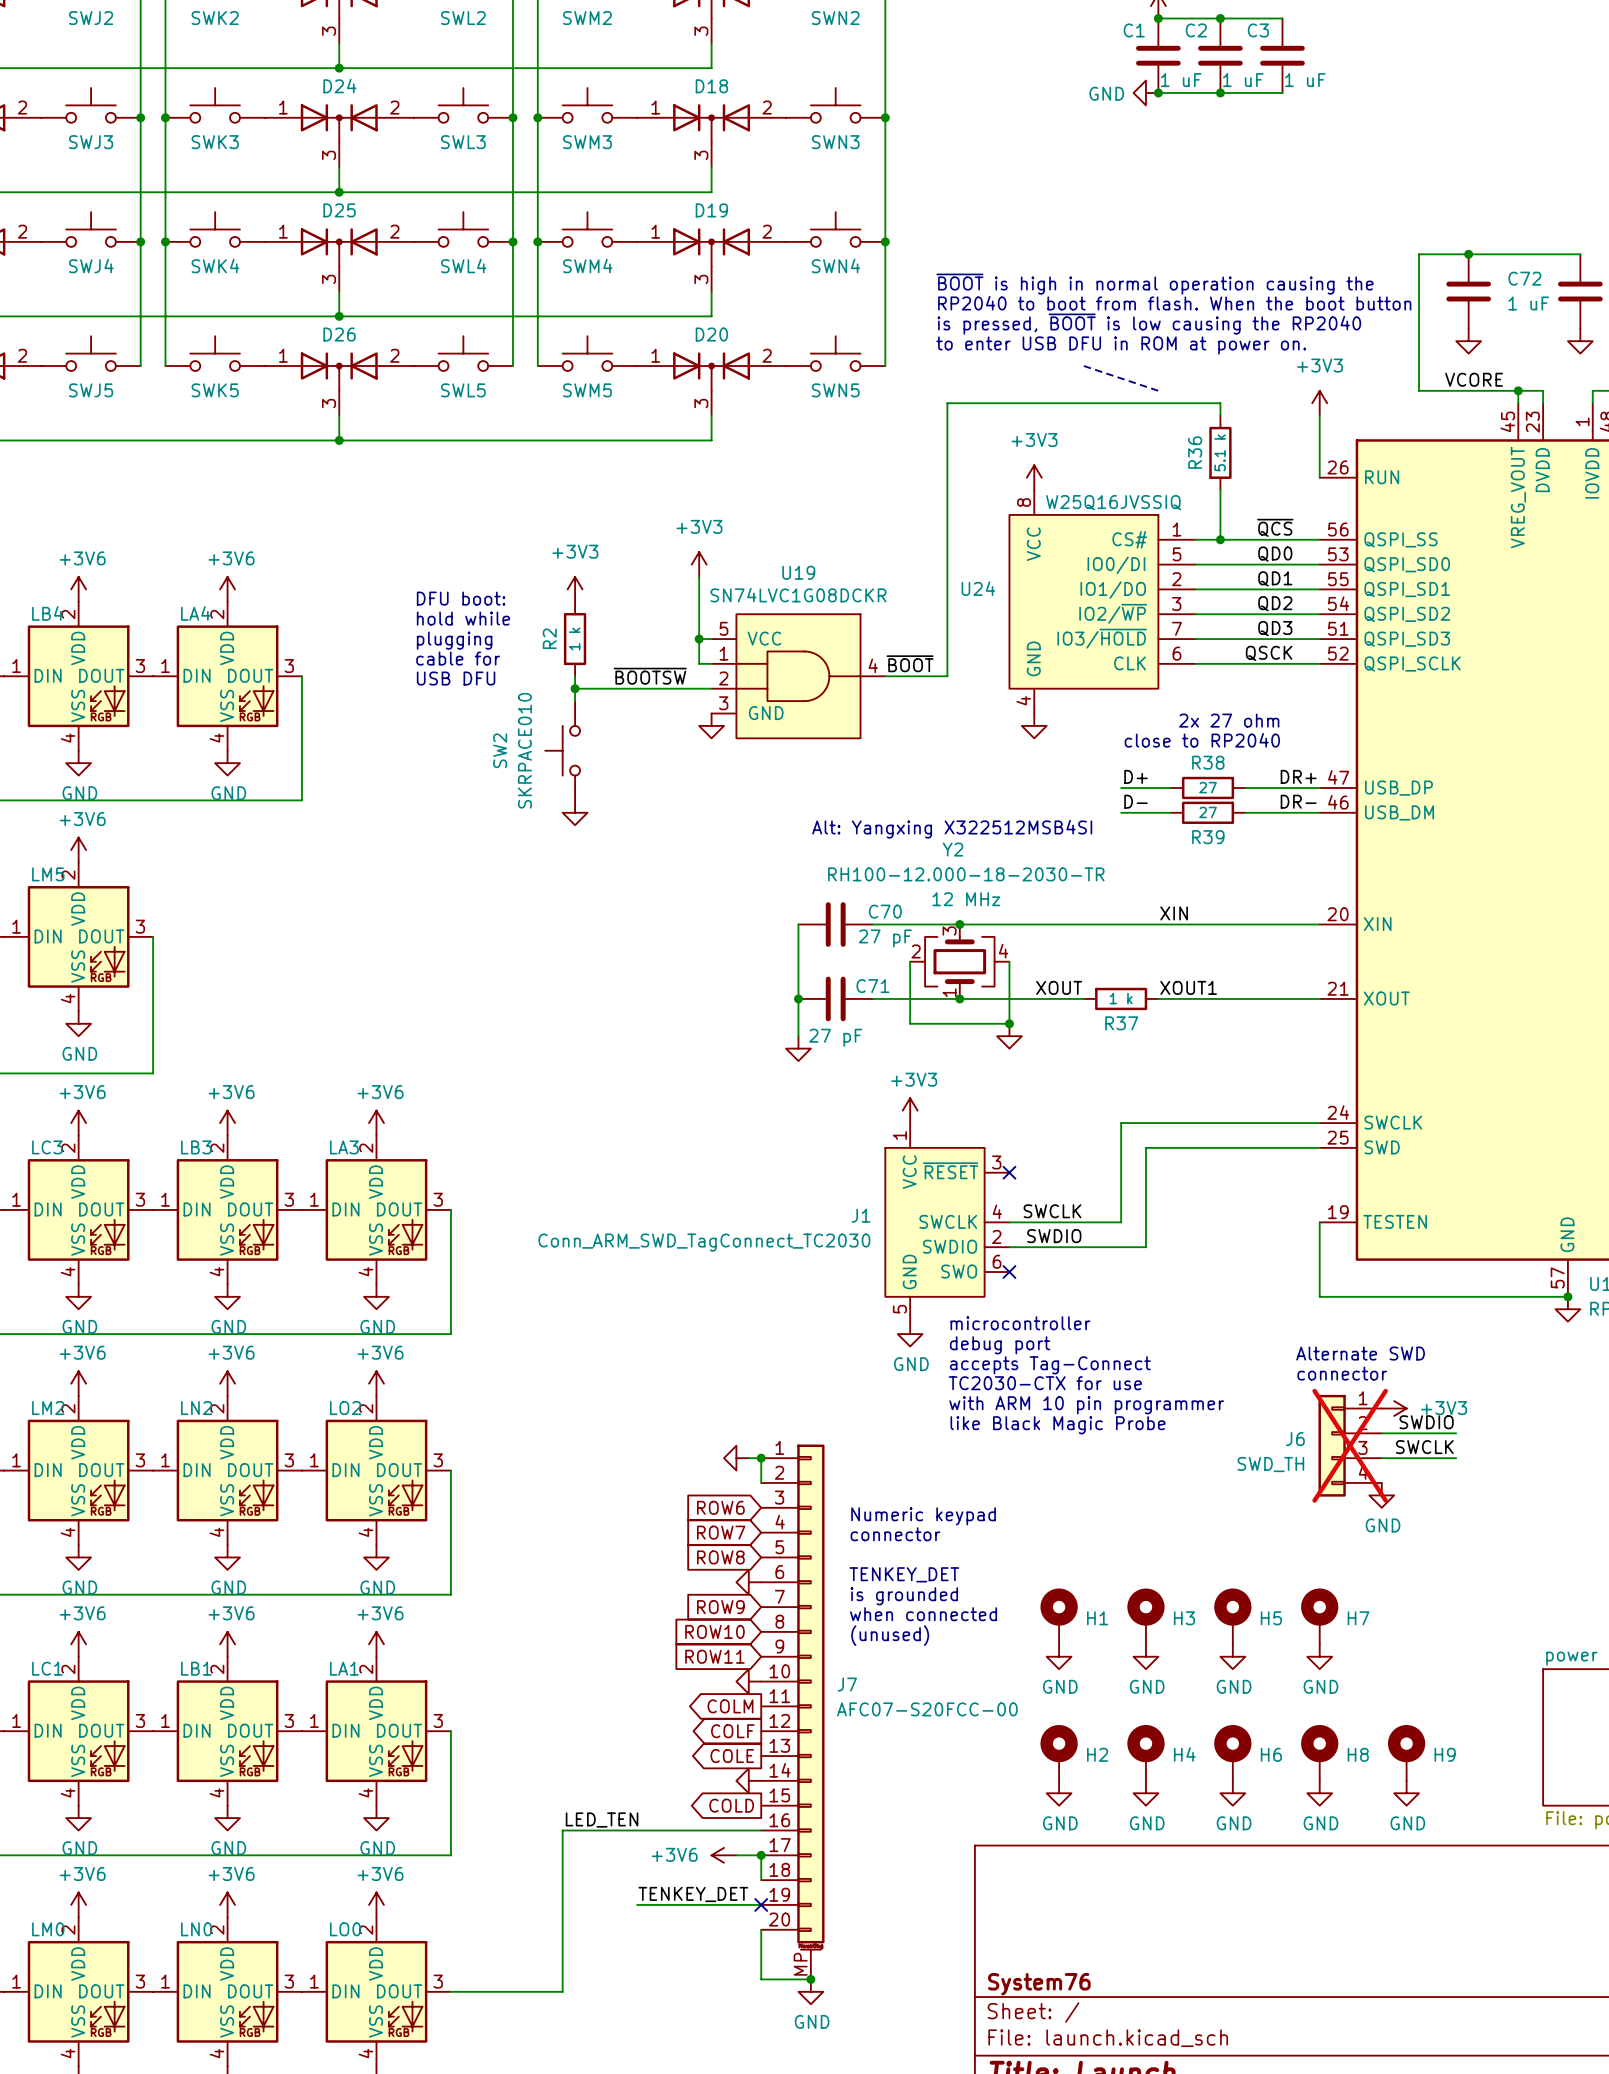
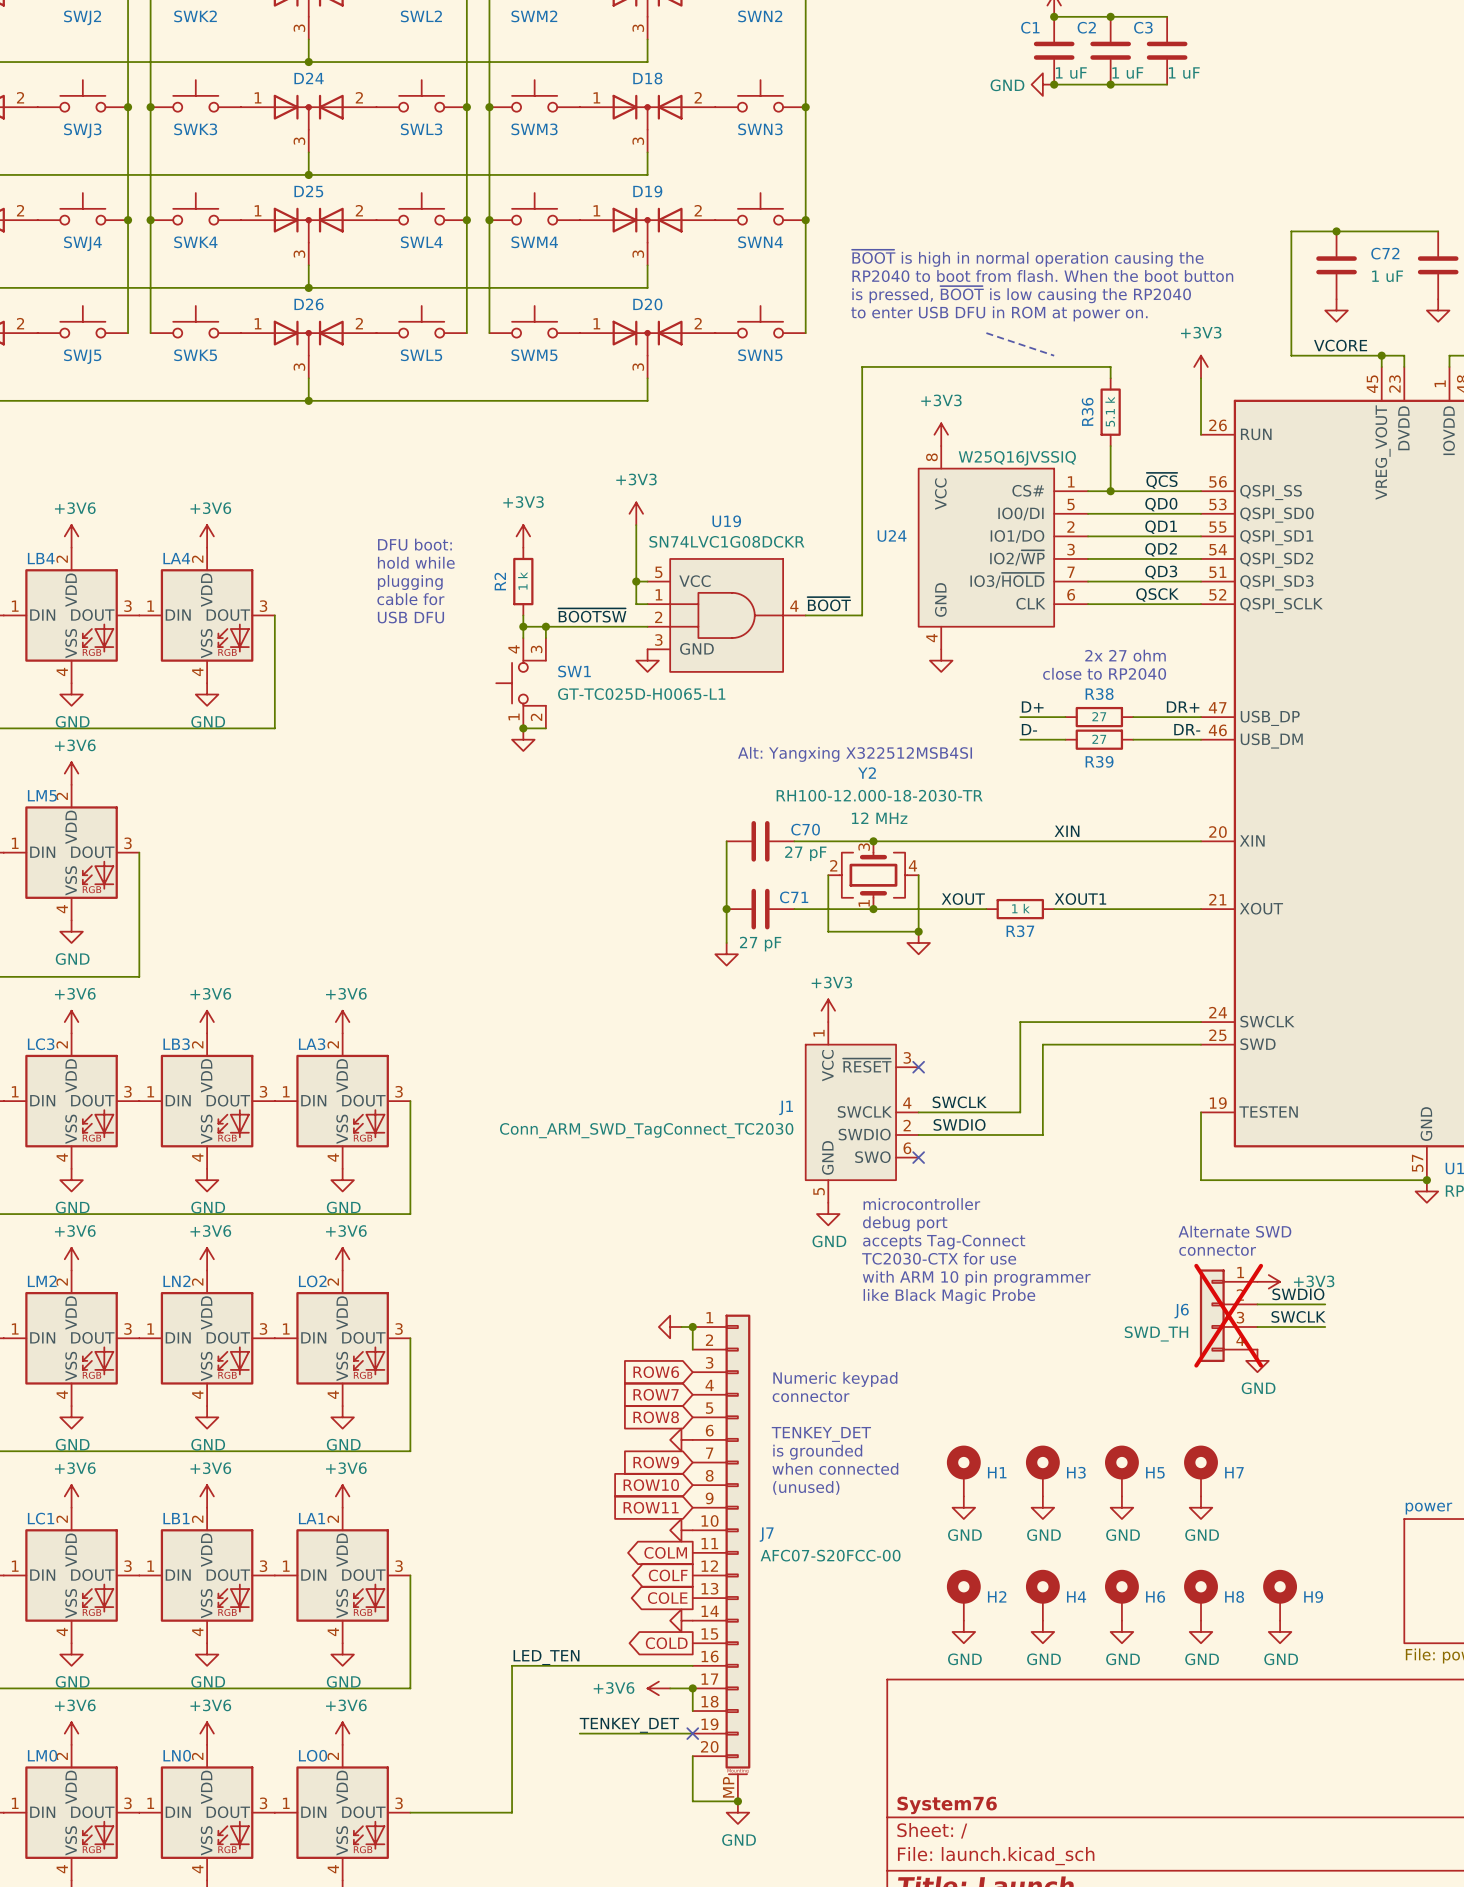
wire: none -> (545, 626) (545, 638)
junction: none -> (545, 626)
SW2: SKRPACE010 (562, 750) -> none
SW1: none -> GT-TC025D-H0065-L1 (521, 683)
wire: none -> (523, 728) (545, 728)
junction: none -> (523, 728)

